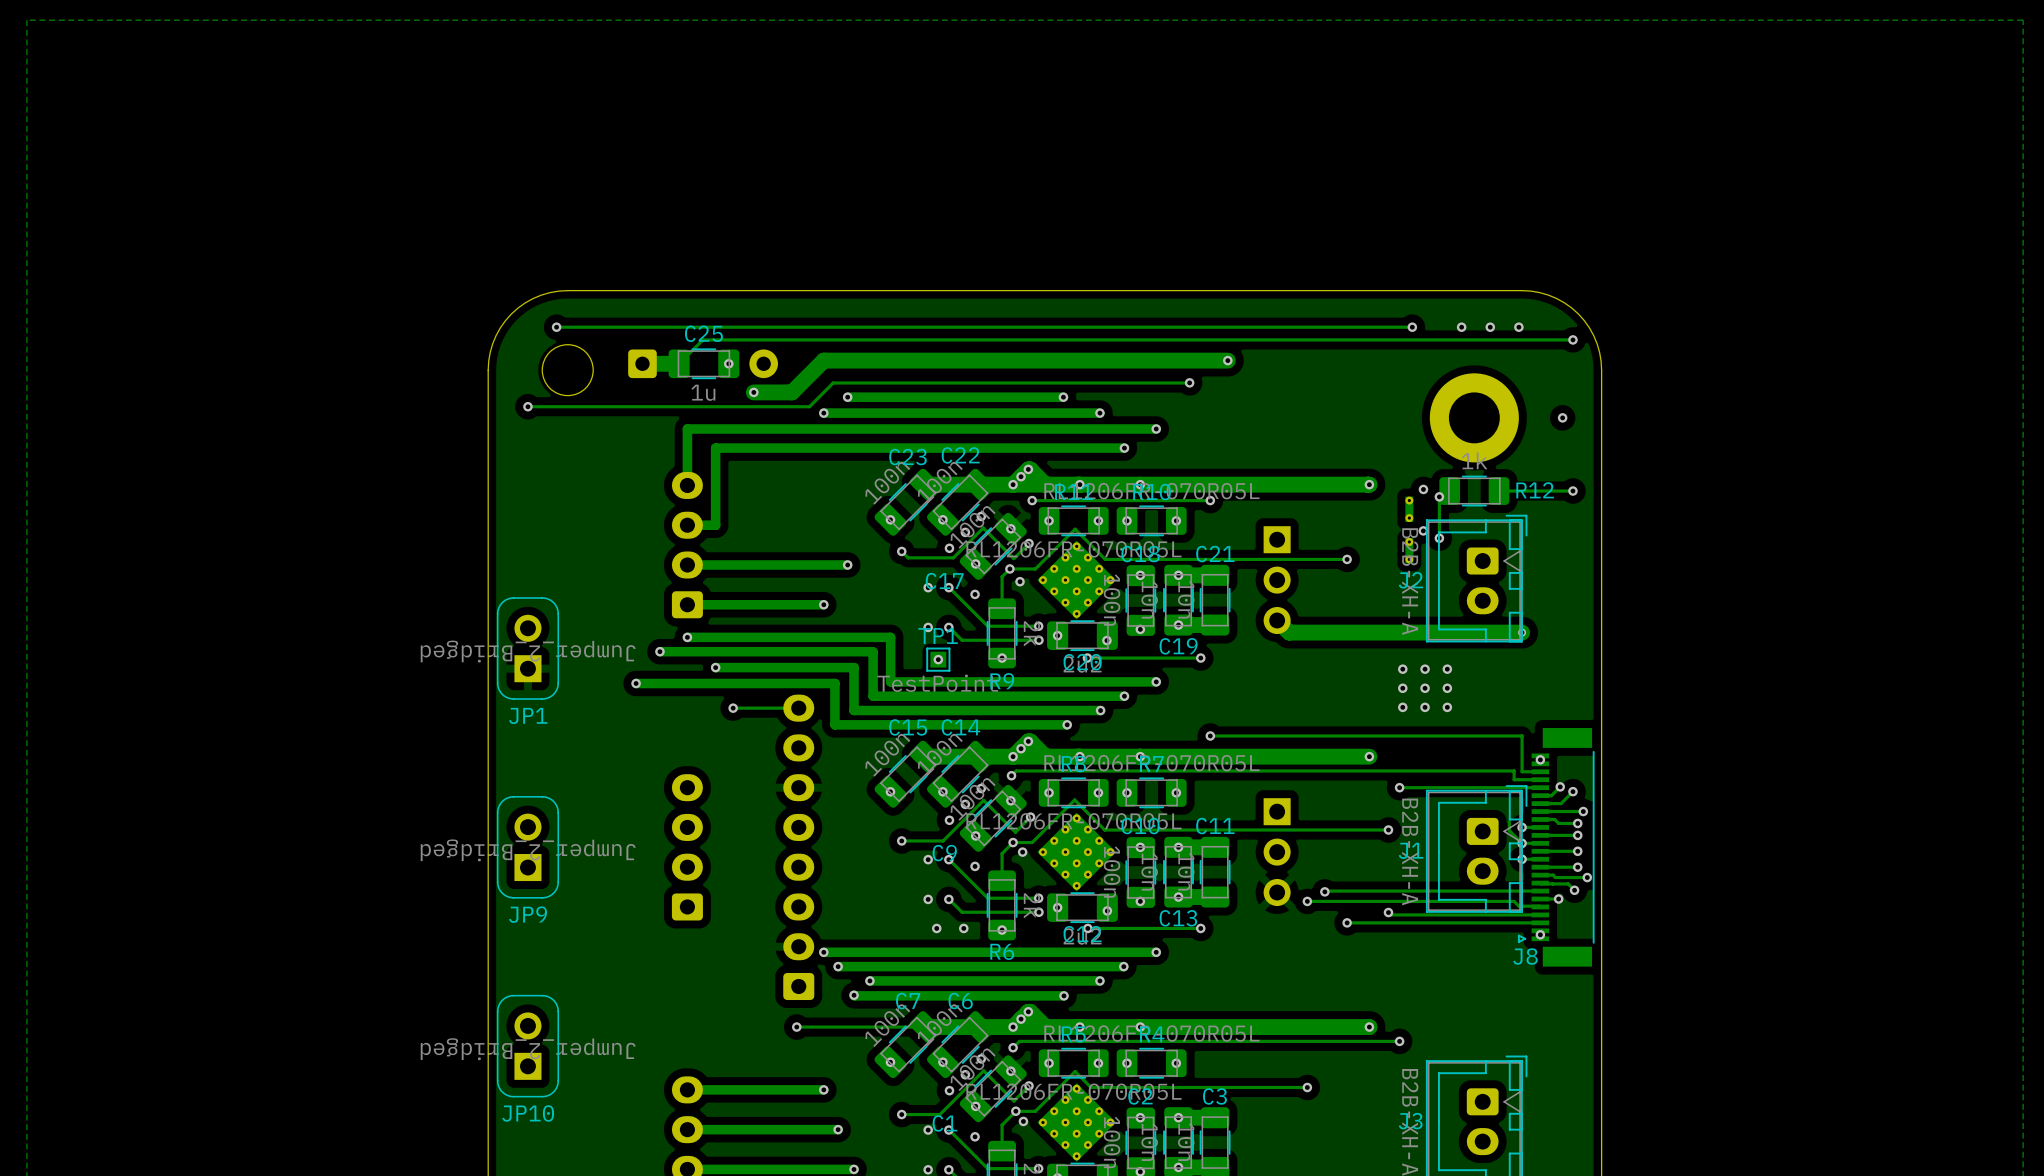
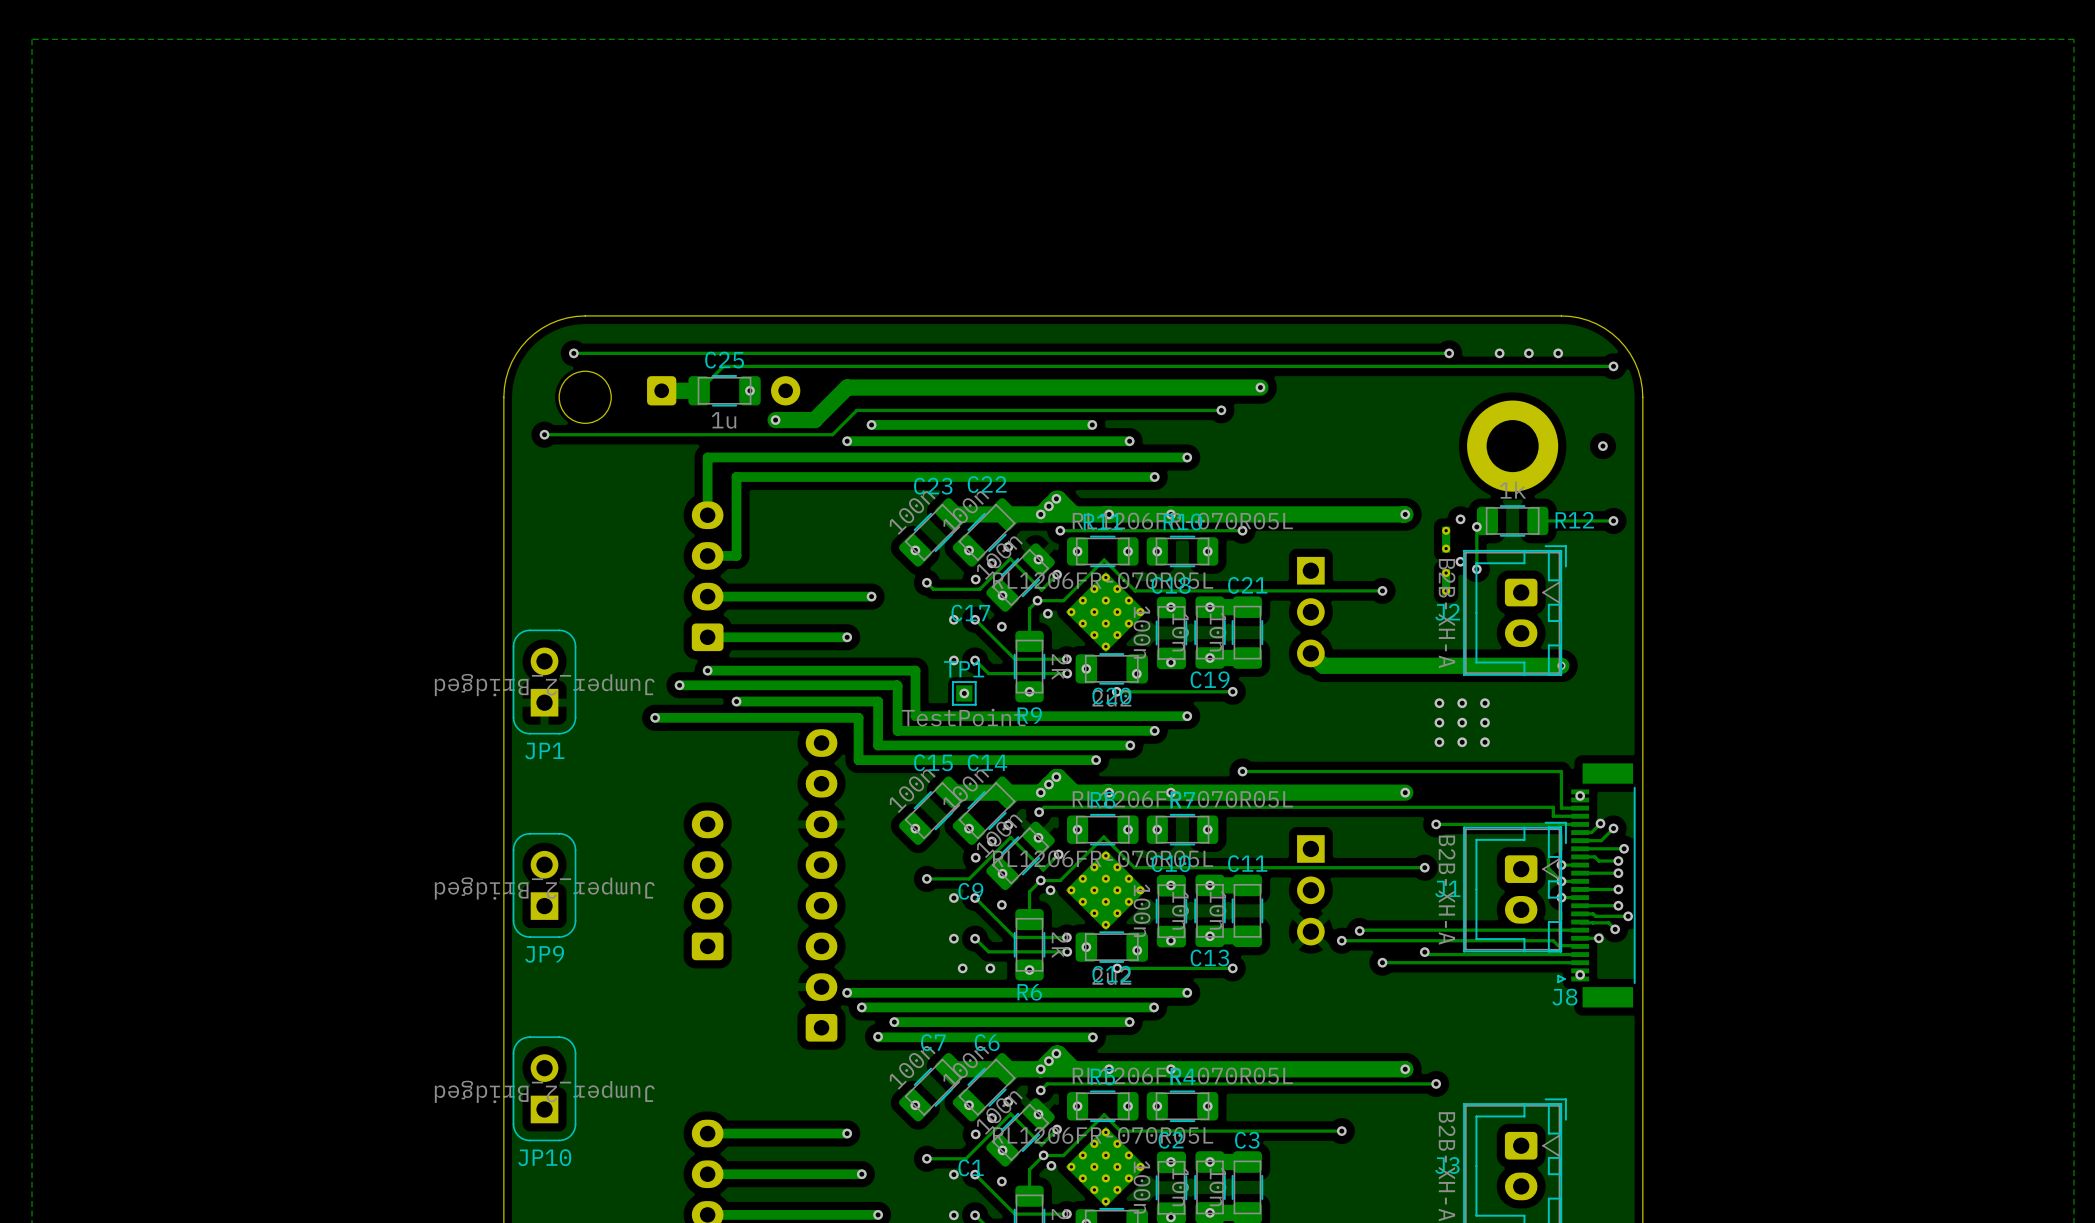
via: (733, 708) -> none
track: (798, 708) (733, 708) -> none
via: (796, 1027) -> none
track: (925, 1027) (796, 1027) -> none

